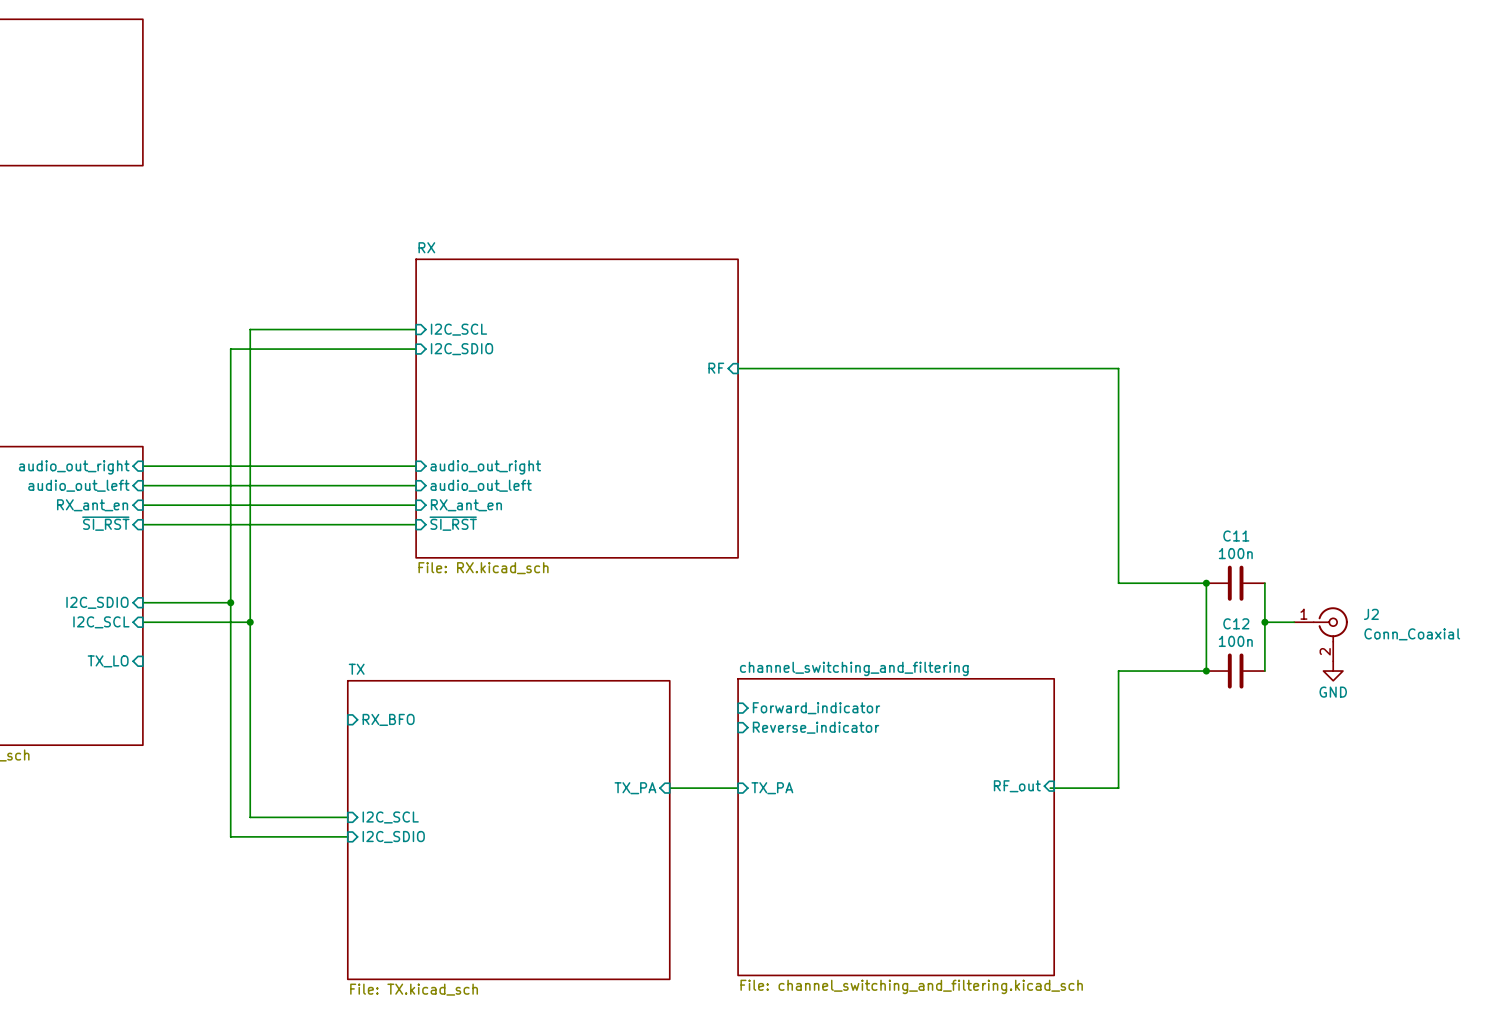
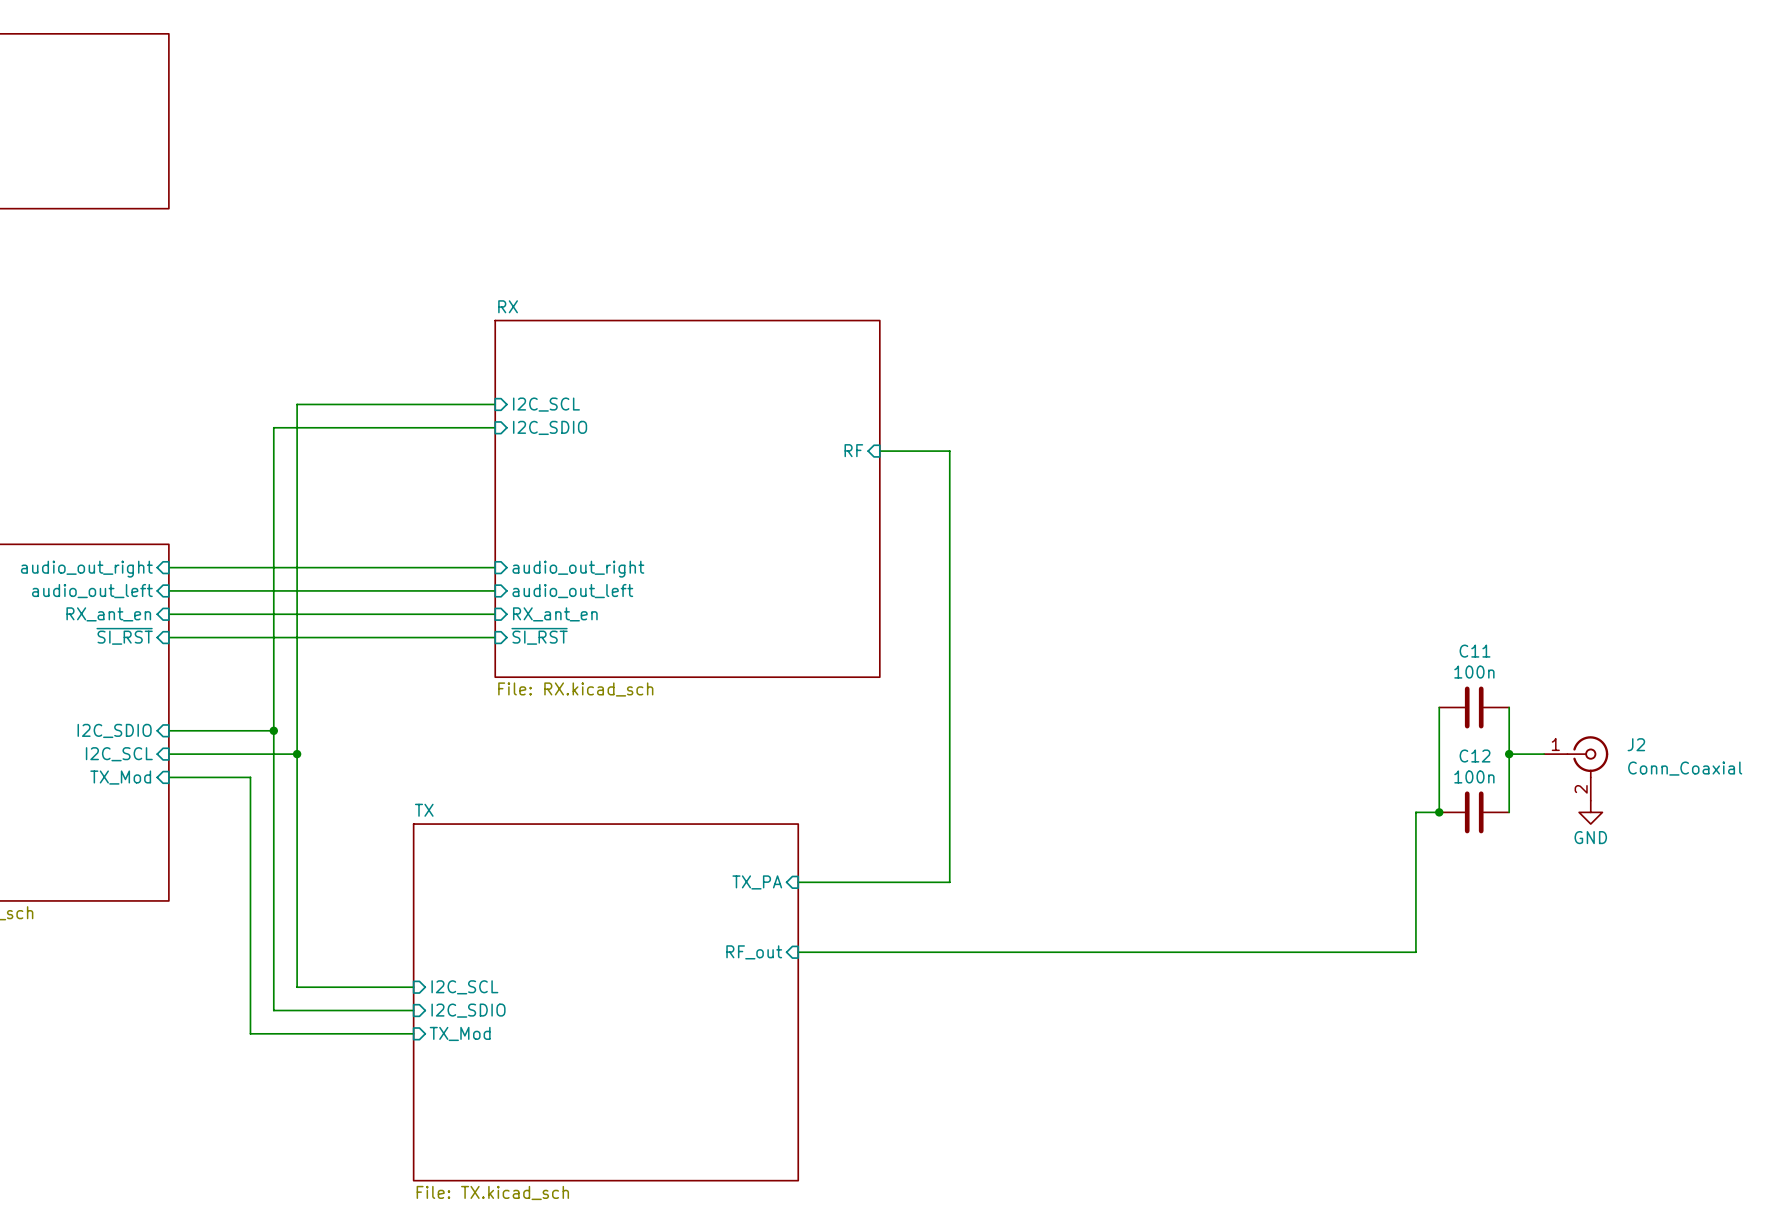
wire: (796, 368) (1118, 368) (1118, 583) (1206, 583) -> (949, 451) (949, 882) (798, 882)
junction: (1206, 583) -> none
sheet pin: none -> TX_Mod (120, 777)
wire: none -> (168, 777) (250, 777) (250, 1033) (413, 1033)
sheet pin: TX_LO (108, 661) -> none
wire: (1186, 671) (1118, 671) (1118, 788) -> (1415, 812) (1415, 952) (1334, 952)
sheet pin: Forward_indicator (816, 708) -> none
sheet pin: RX_BFO (388, 719) -> none
sheet pin: Reverse_indicator (816, 727) -> none
sheet pin: RF_out (1017, 786) -> none
sheet pin: TX_PA (635, 788) -> RF_out (754, 952)
wire: none -> (879, 952) (1252, 952)
sheet pin rotation: 0° (772, 788) -> 180° (757, 882)
sheet pin position: TX_PA (772, 788) -> TX_PA (757, 882)
sheet channel_switching_and_filtering: File: channel_switching_and_filtering.kicad_sch (896, 827) -> none
sheet pin: none -> TX_Mod (460, 1033)

